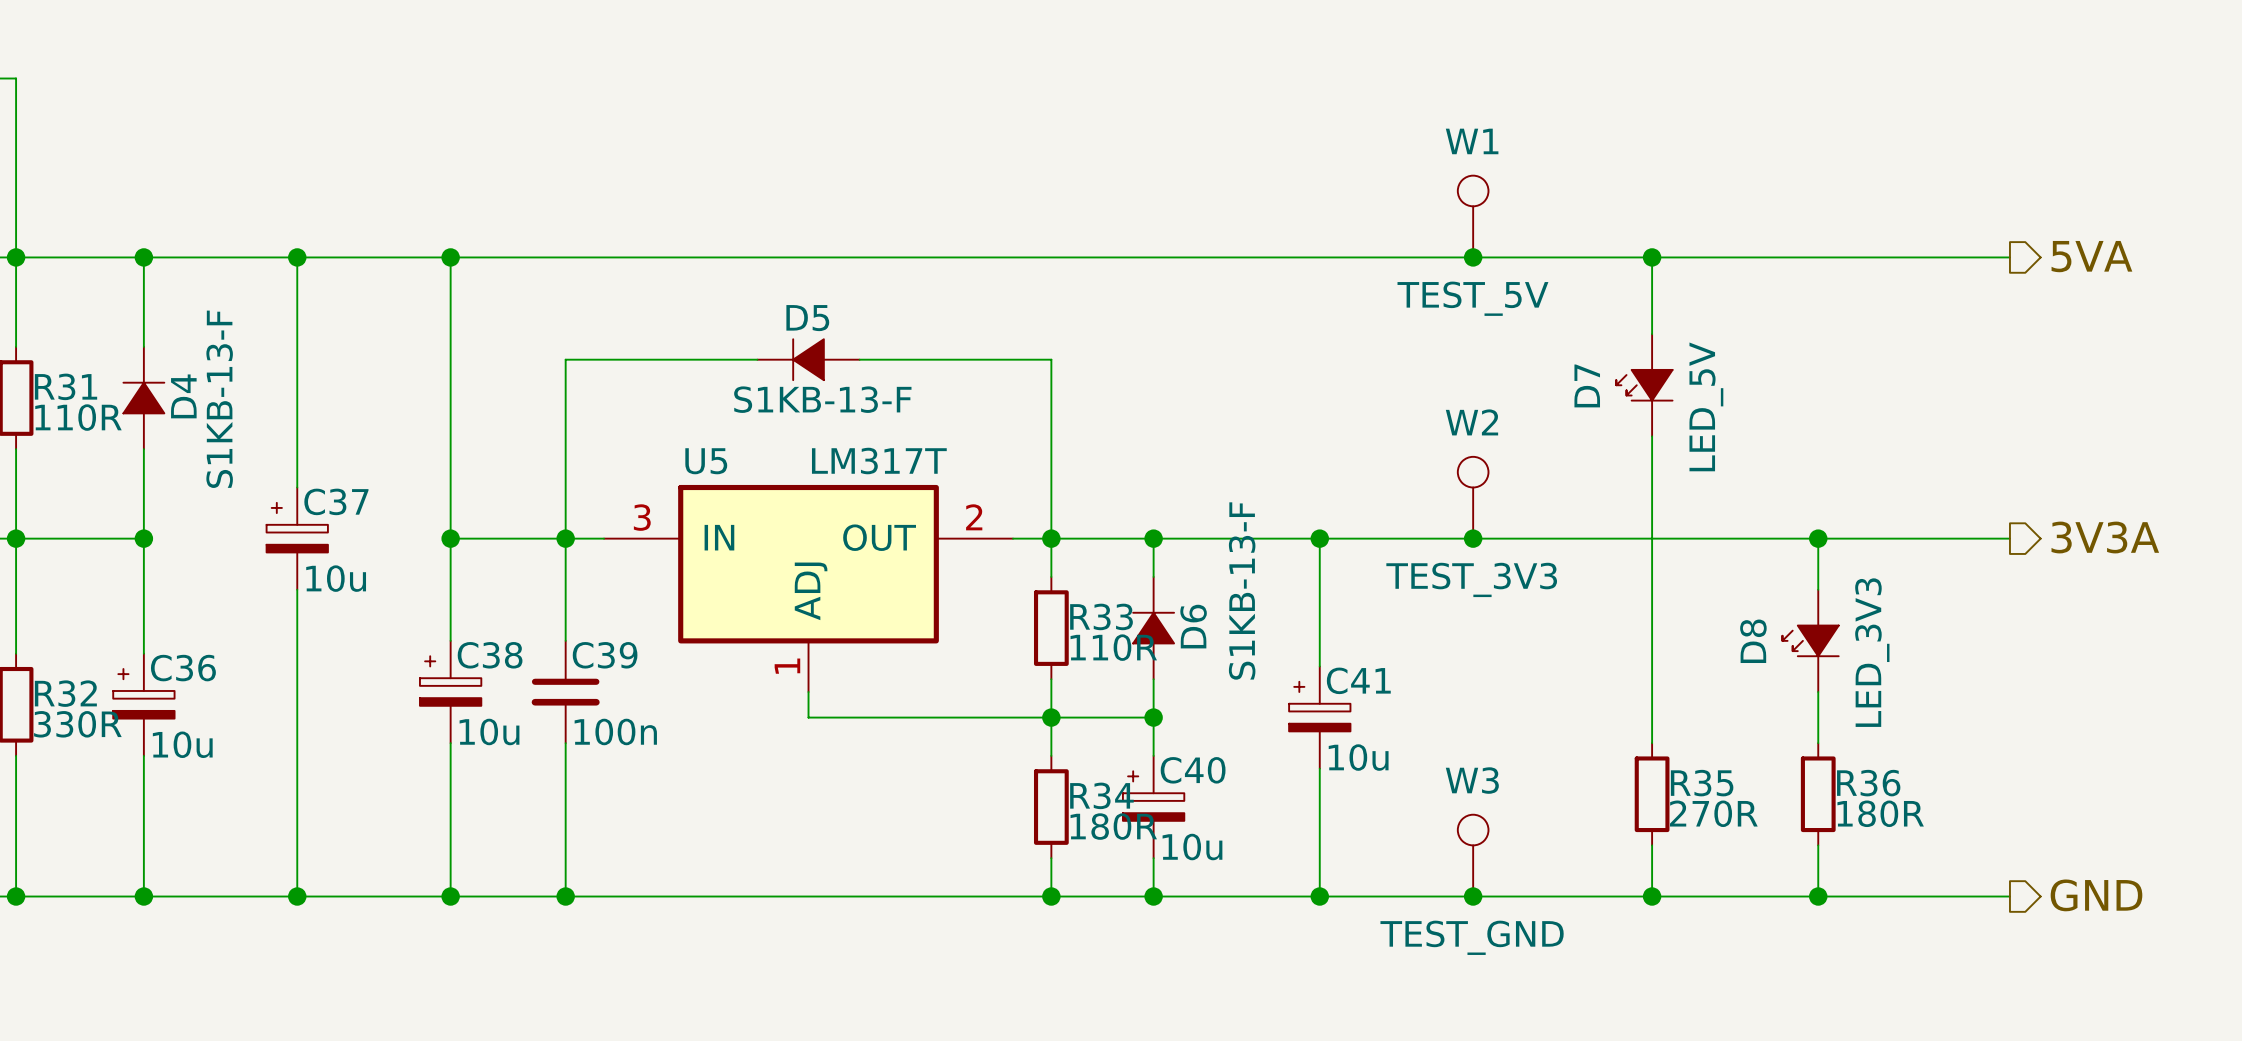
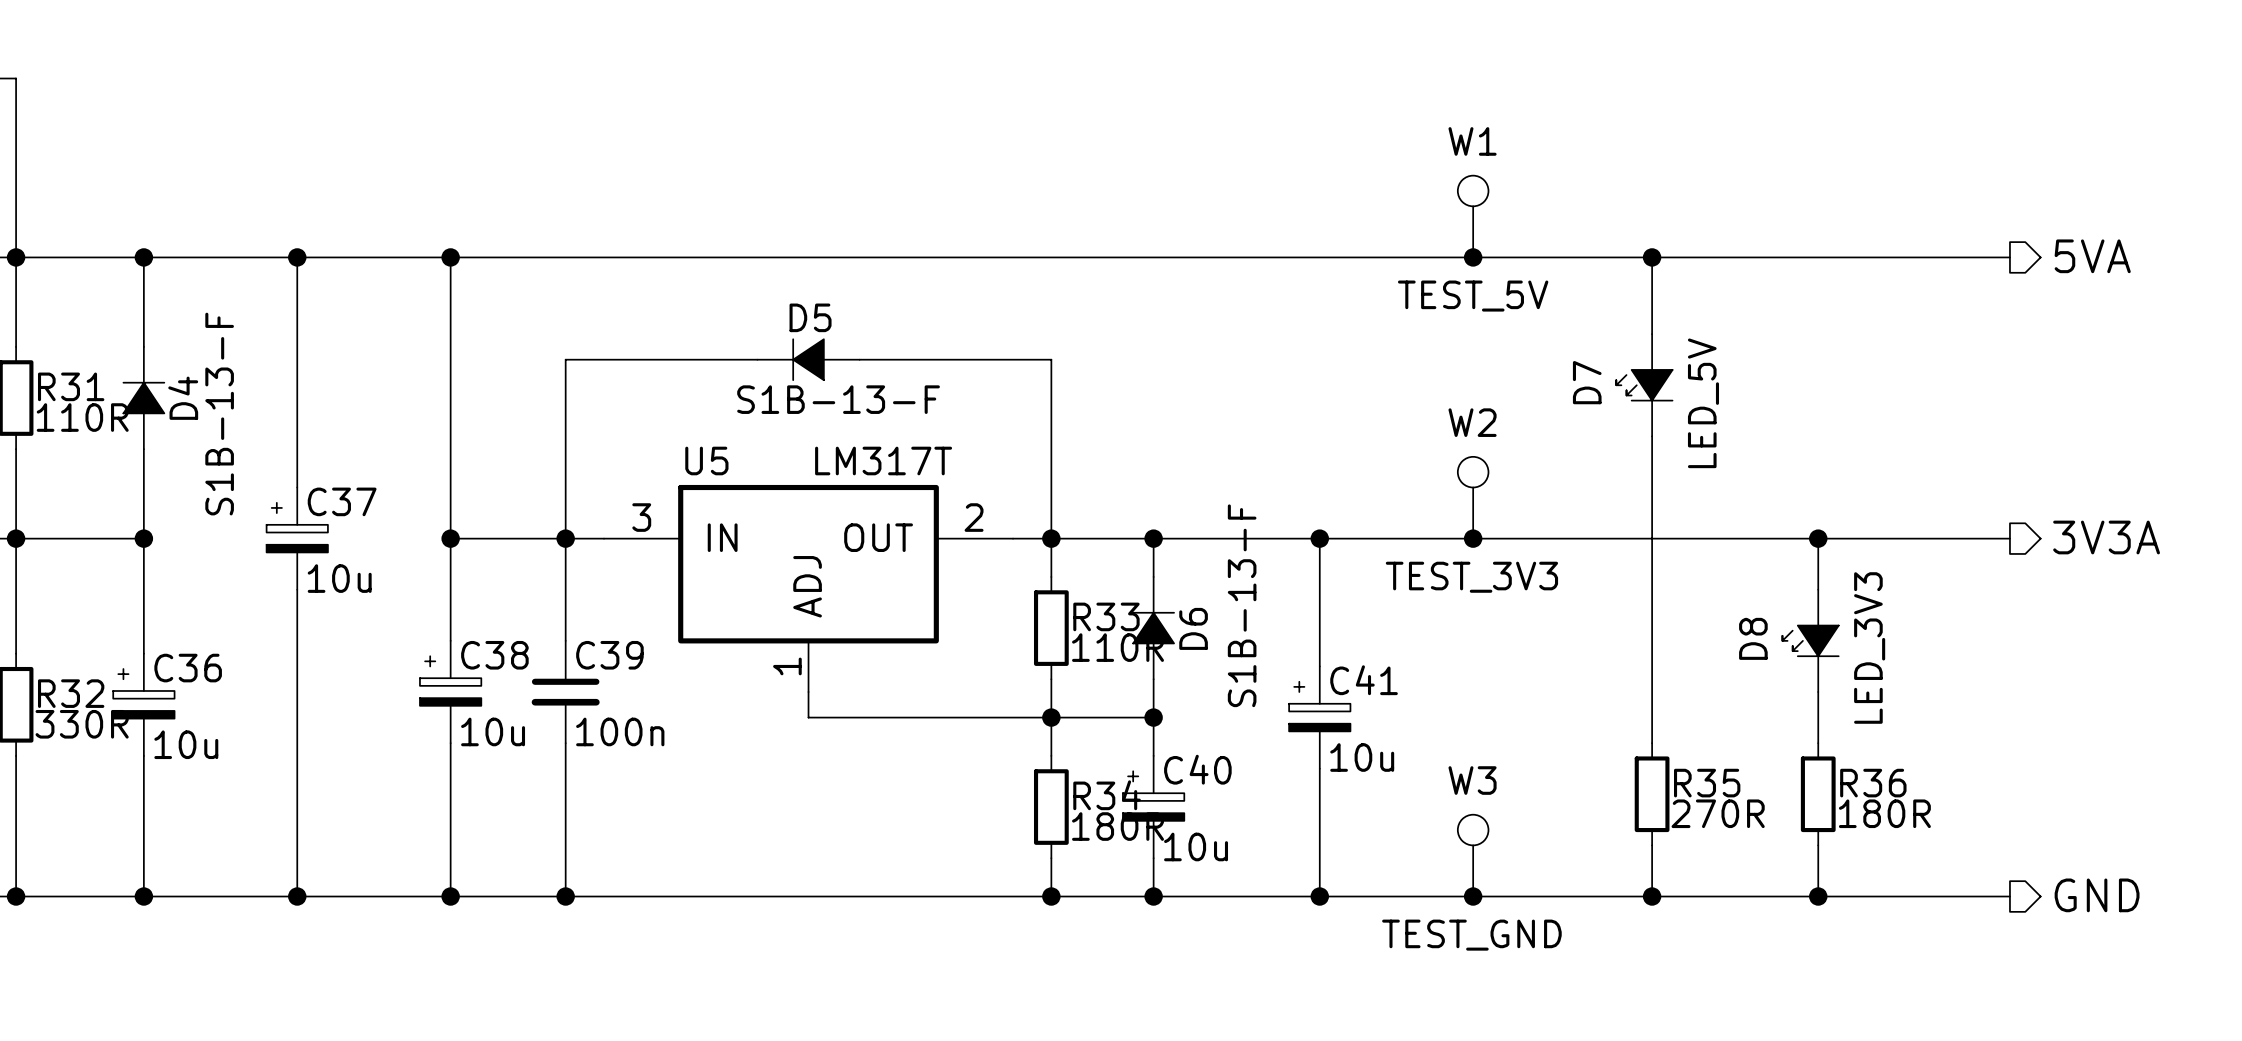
D4 value: S1KB-13-F (219, 399) -> S1B-13-F (219, 414)
D5 value: S1KB-13-F (822, 399) -> S1B-13-F (838, 399)
D6 value: S1KB-13-F (1242, 591) -> S1B-13-F (1242, 605)

